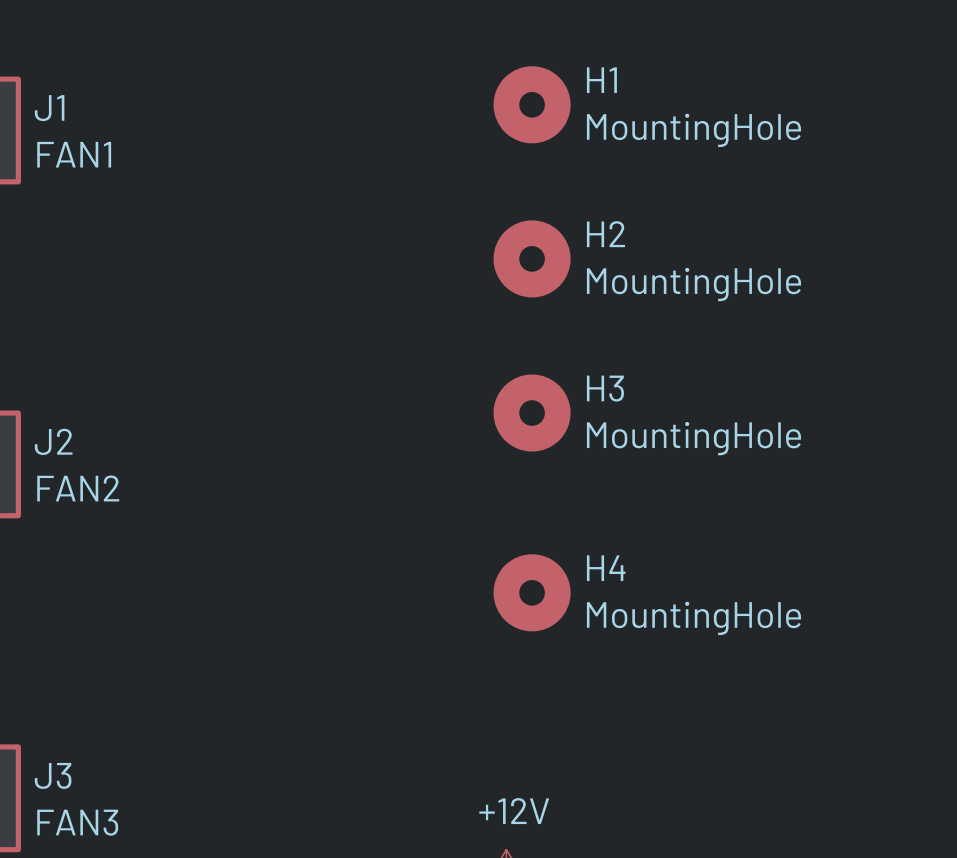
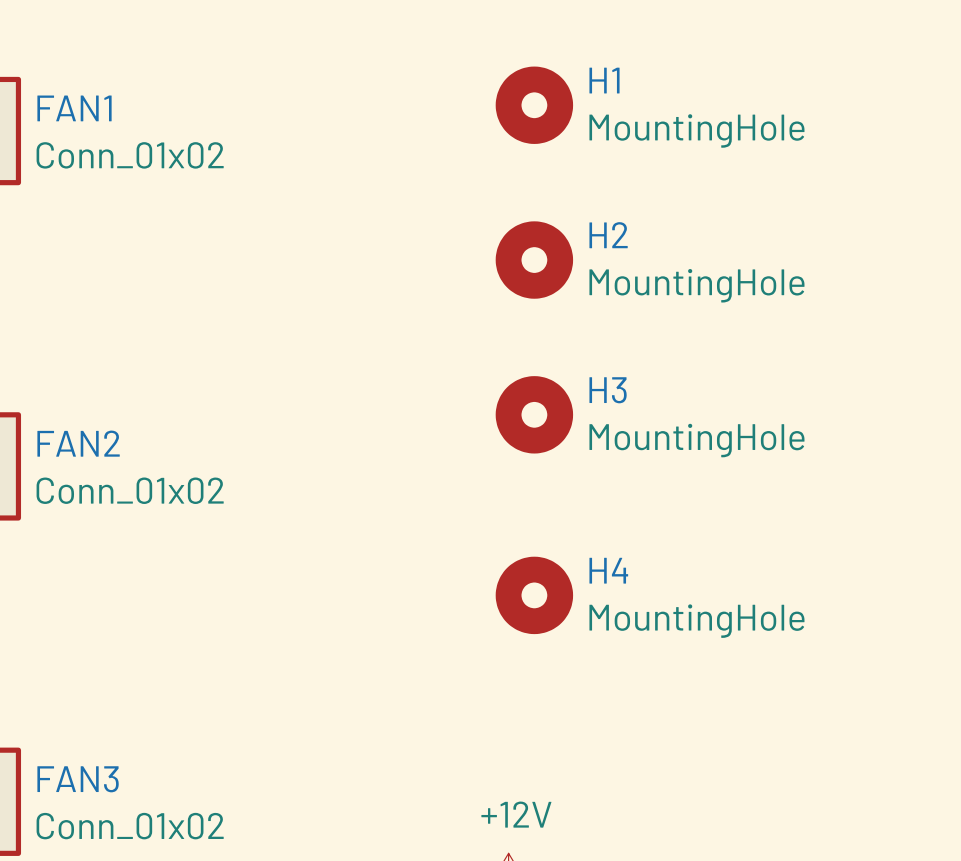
J1 name: J1 (49, 108) -> FAN1 (74, 108)
J1 value: FAN1 (74, 154) -> Conn_01x02 (130, 155)
J2 name: J2 (53, 441) -> FAN2 (78, 443)
J2 value: FAN2 (78, 488) -> Conn_01x02 (130, 490)
J3 name: J3 (53, 775) -> FAN3 (78, 779)
J3 value: FAN3 (77, 822) -> Conn_01x02 (130, 826)

